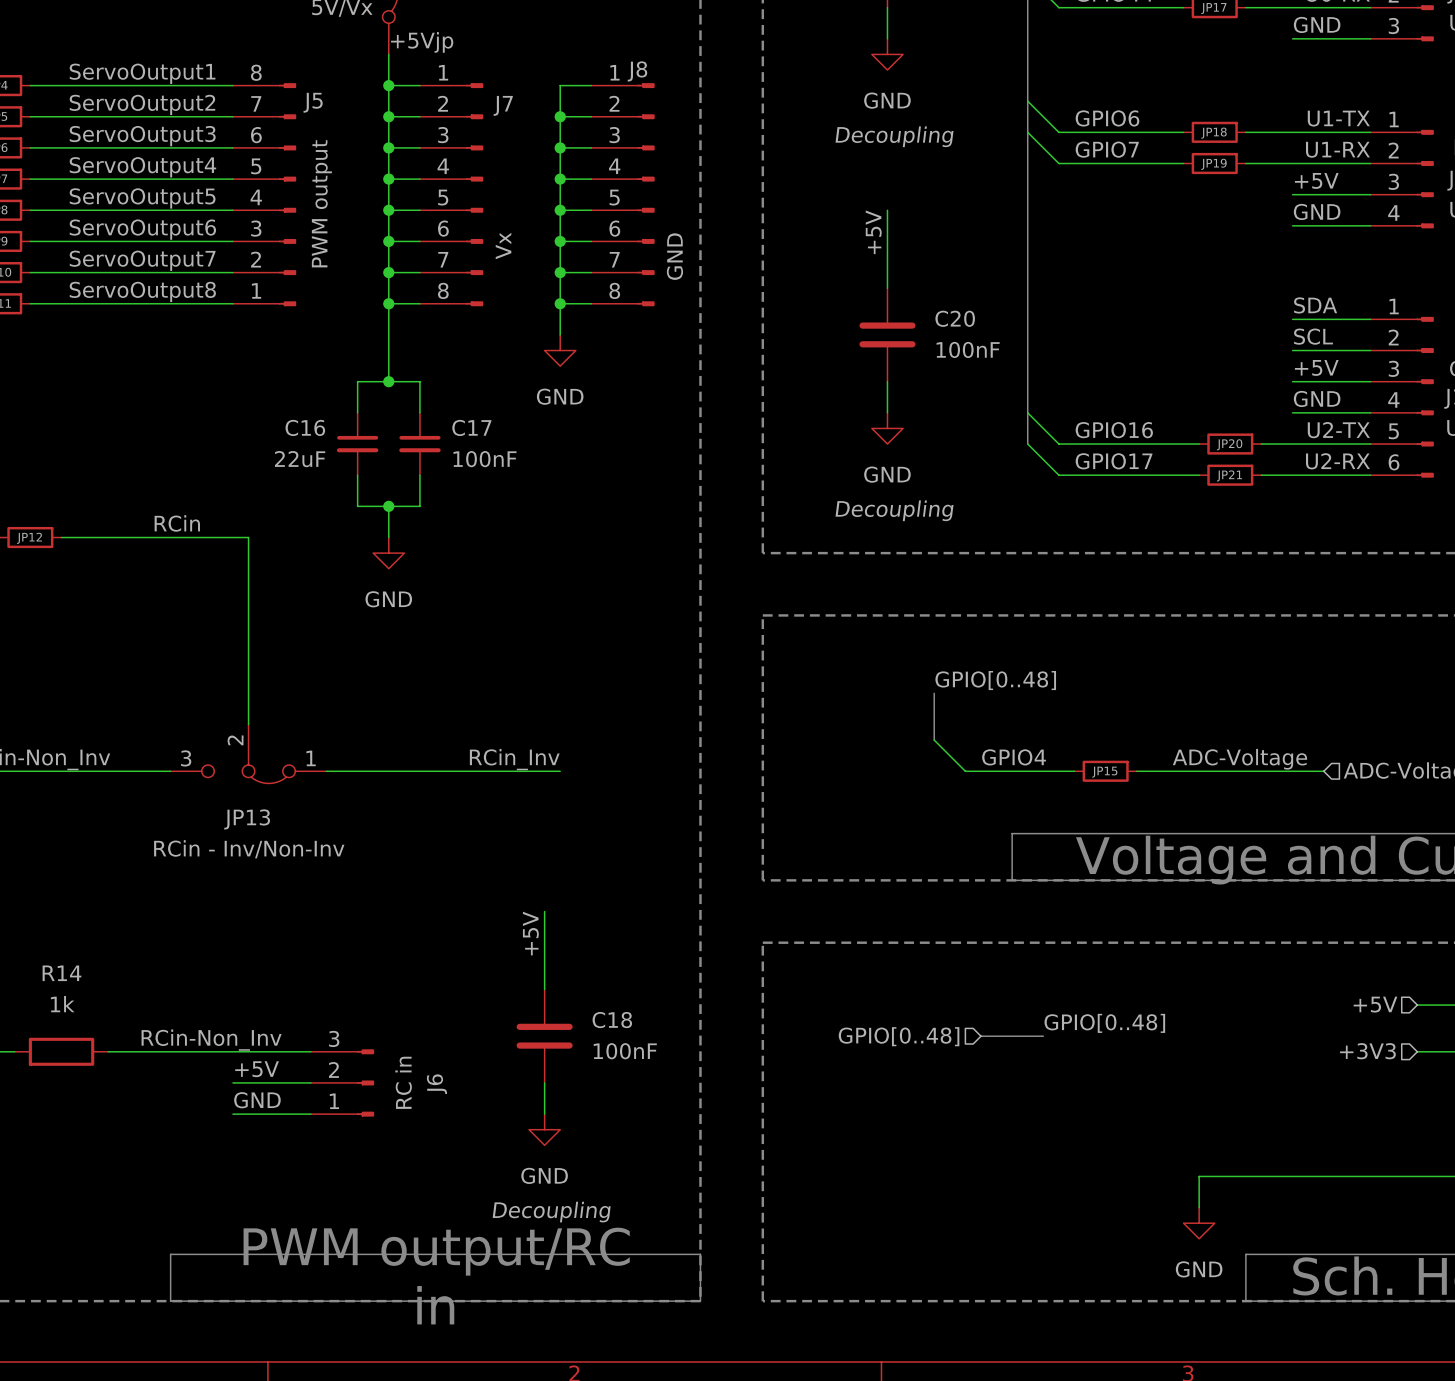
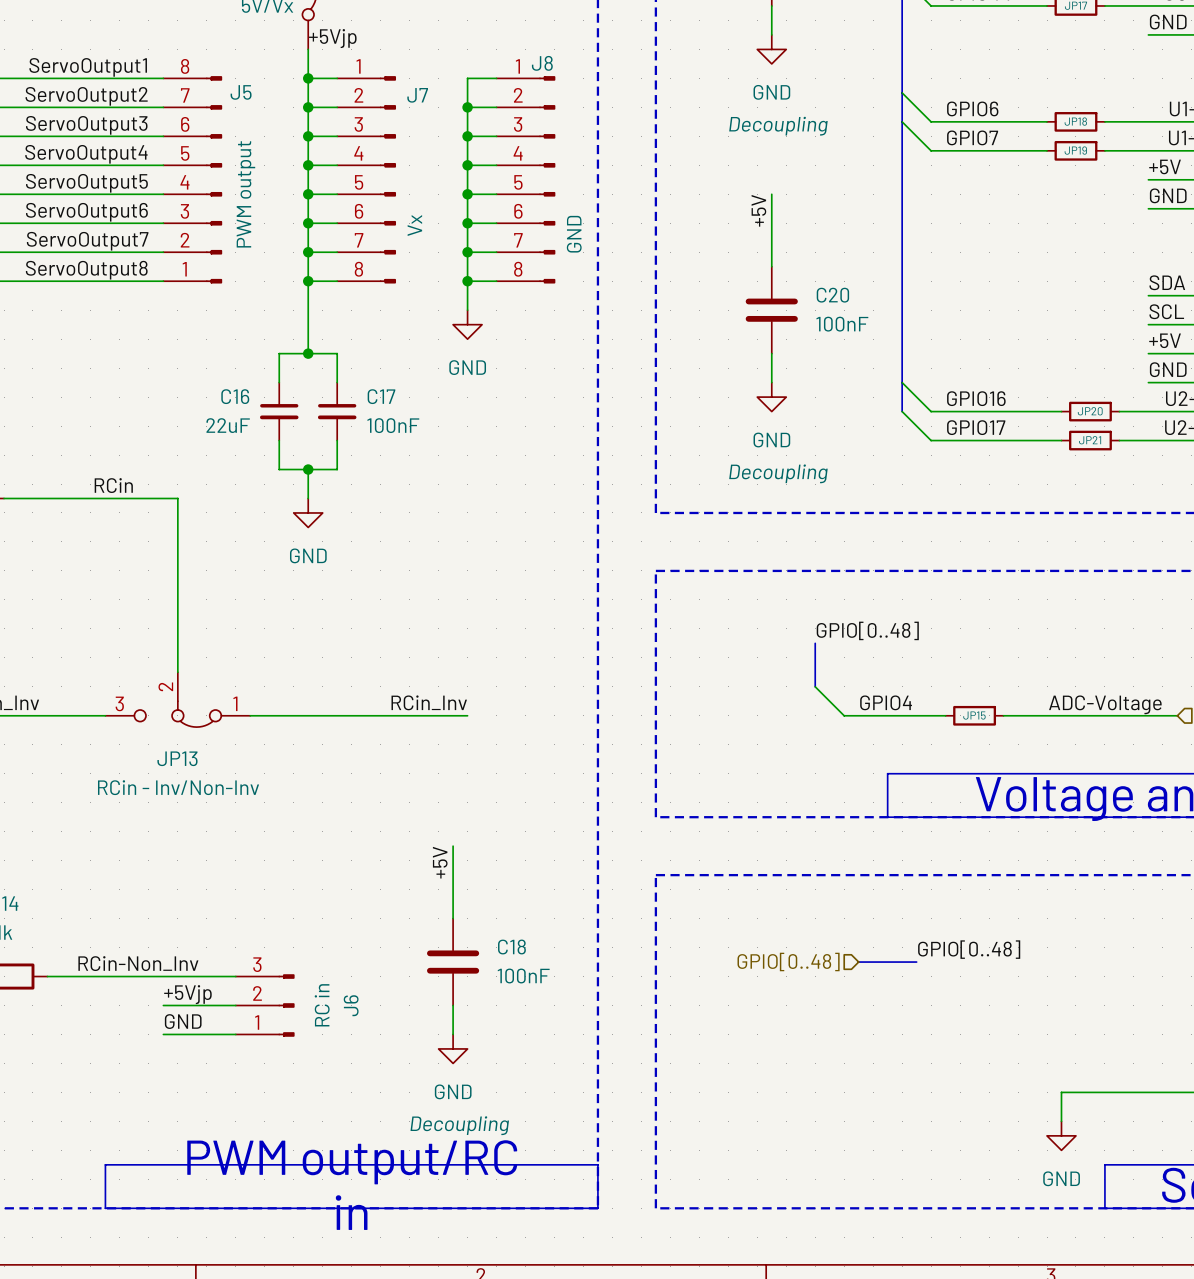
label: +5V (257, 1069) -> +5Vjp (187, 994)

